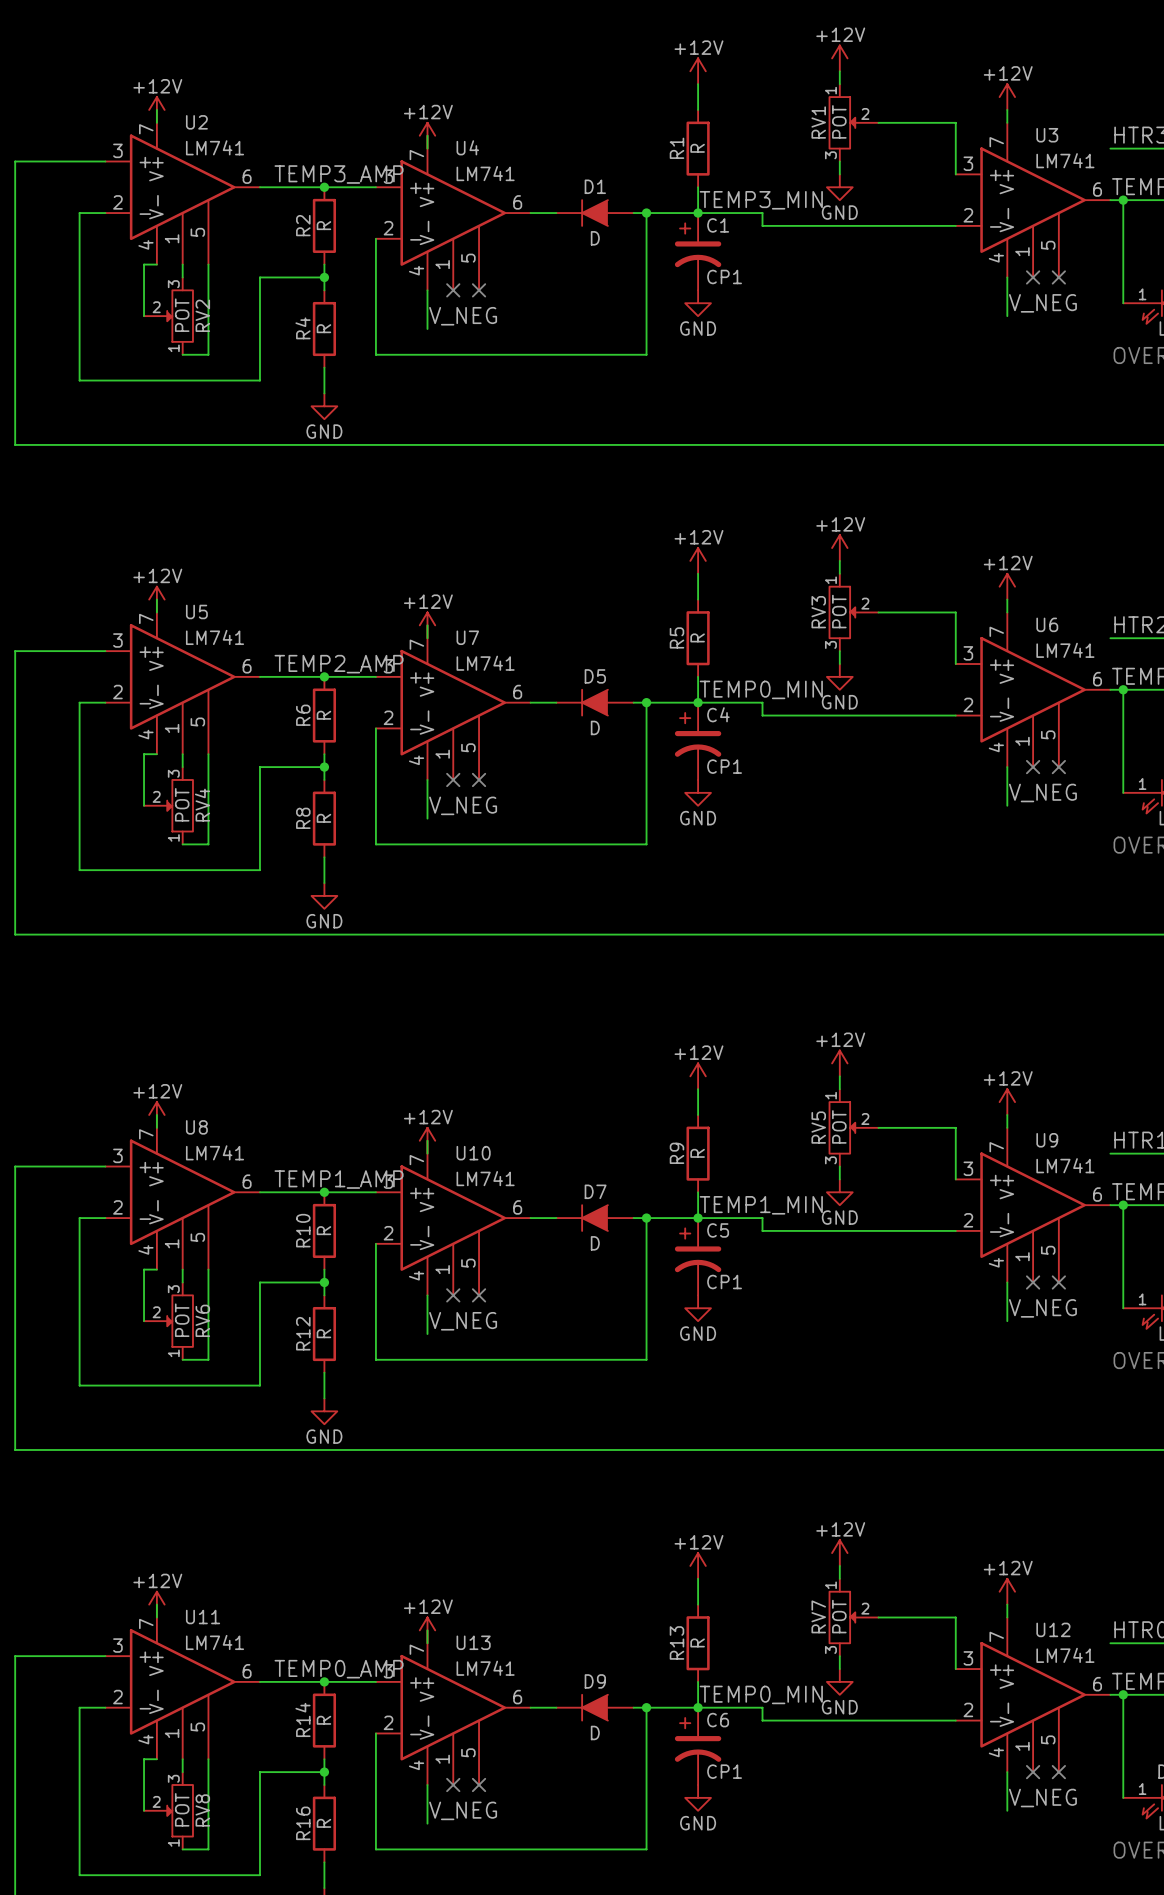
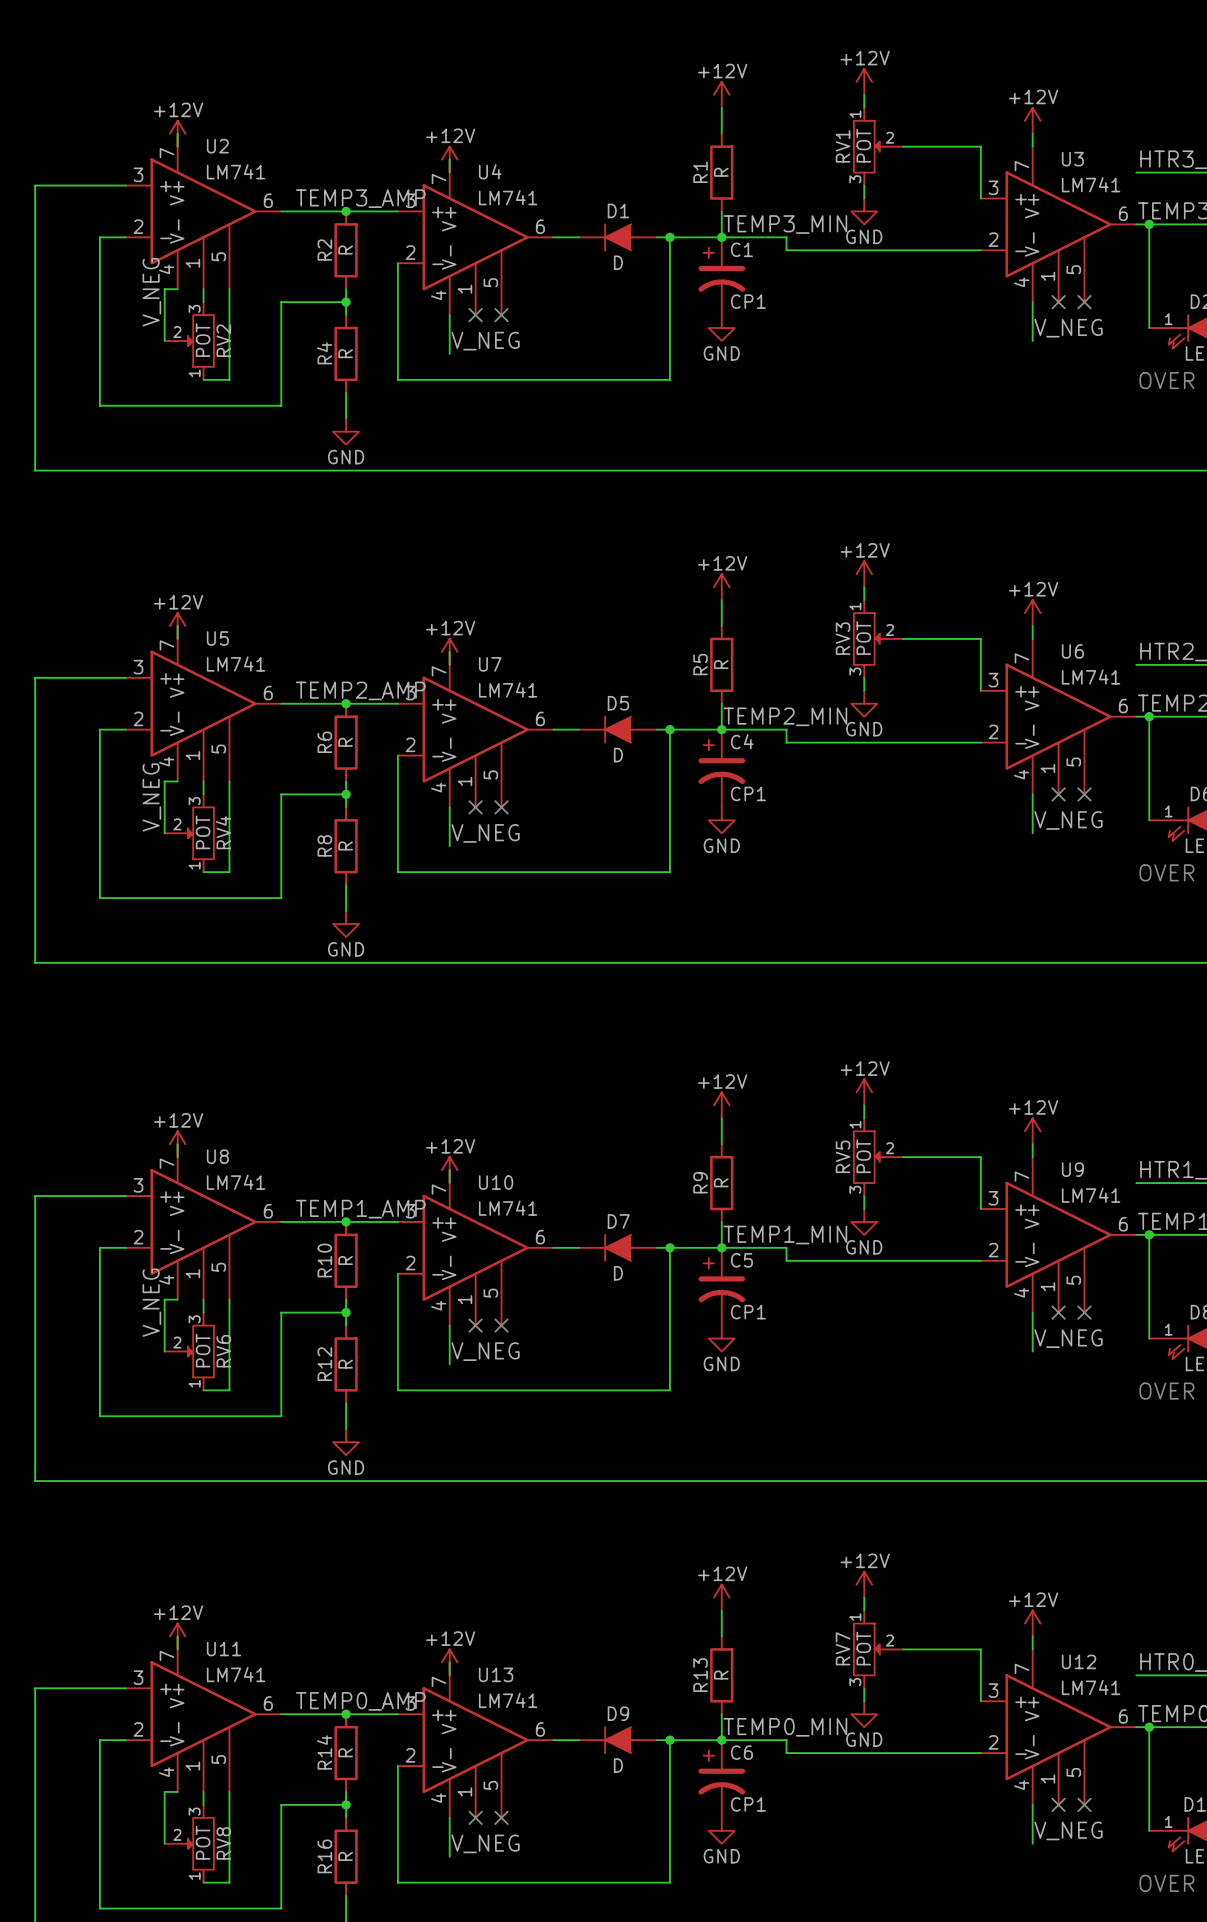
label: none -> V_NEG (151, 292)
label: TEMP0_MIN (761, 689) -> TEMP2_MIN (785, 716)
label: none -> V_NEG (151, 797)
label: none -> V_NEG (151, 1302)

